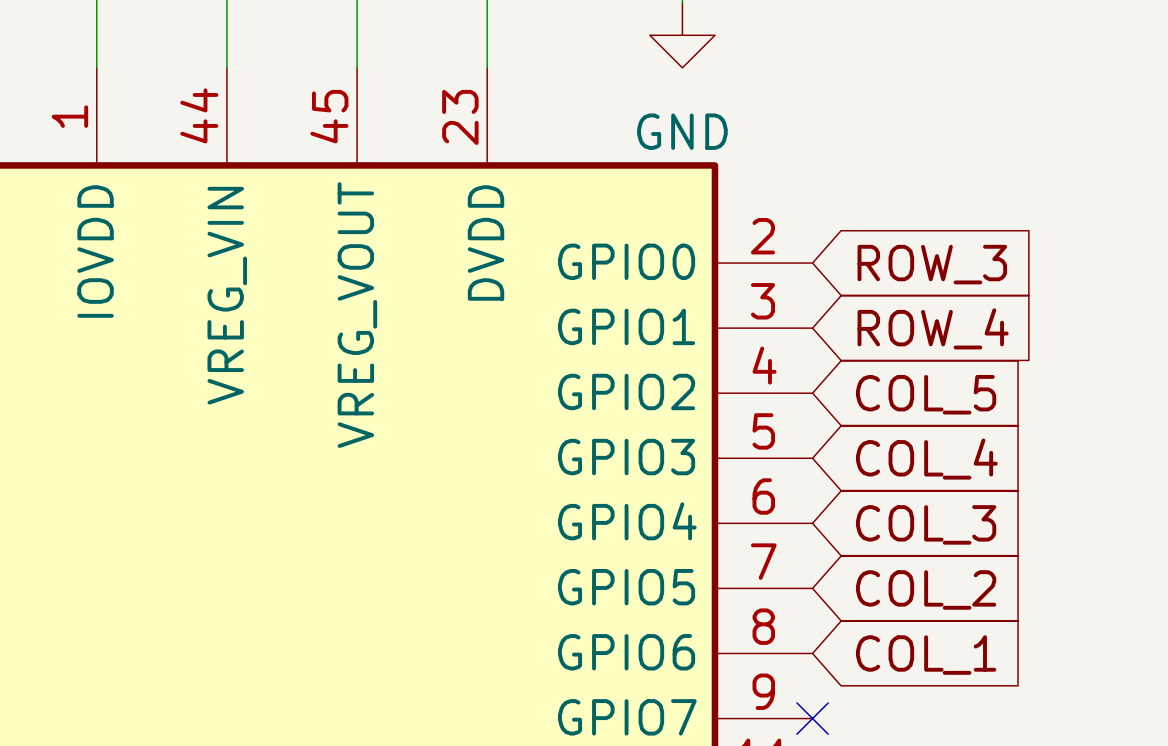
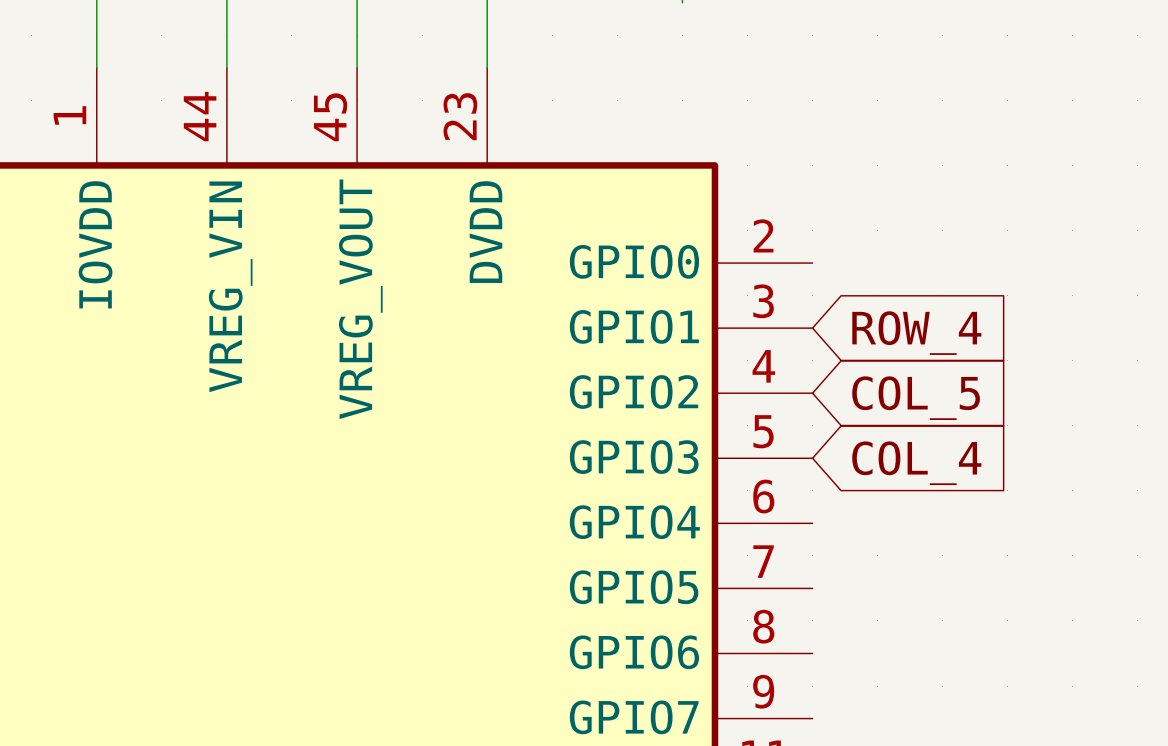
power symbol: GND (682, 35) -> none
global label: ROW_3 (932, 264) -> none
global label: COL_3 (926, 524) -> none
global label: COL_2 (926, 589) -> none
global label: COL_1 (926, 655) -> none
no-connect mark: (812, 718) -> none

